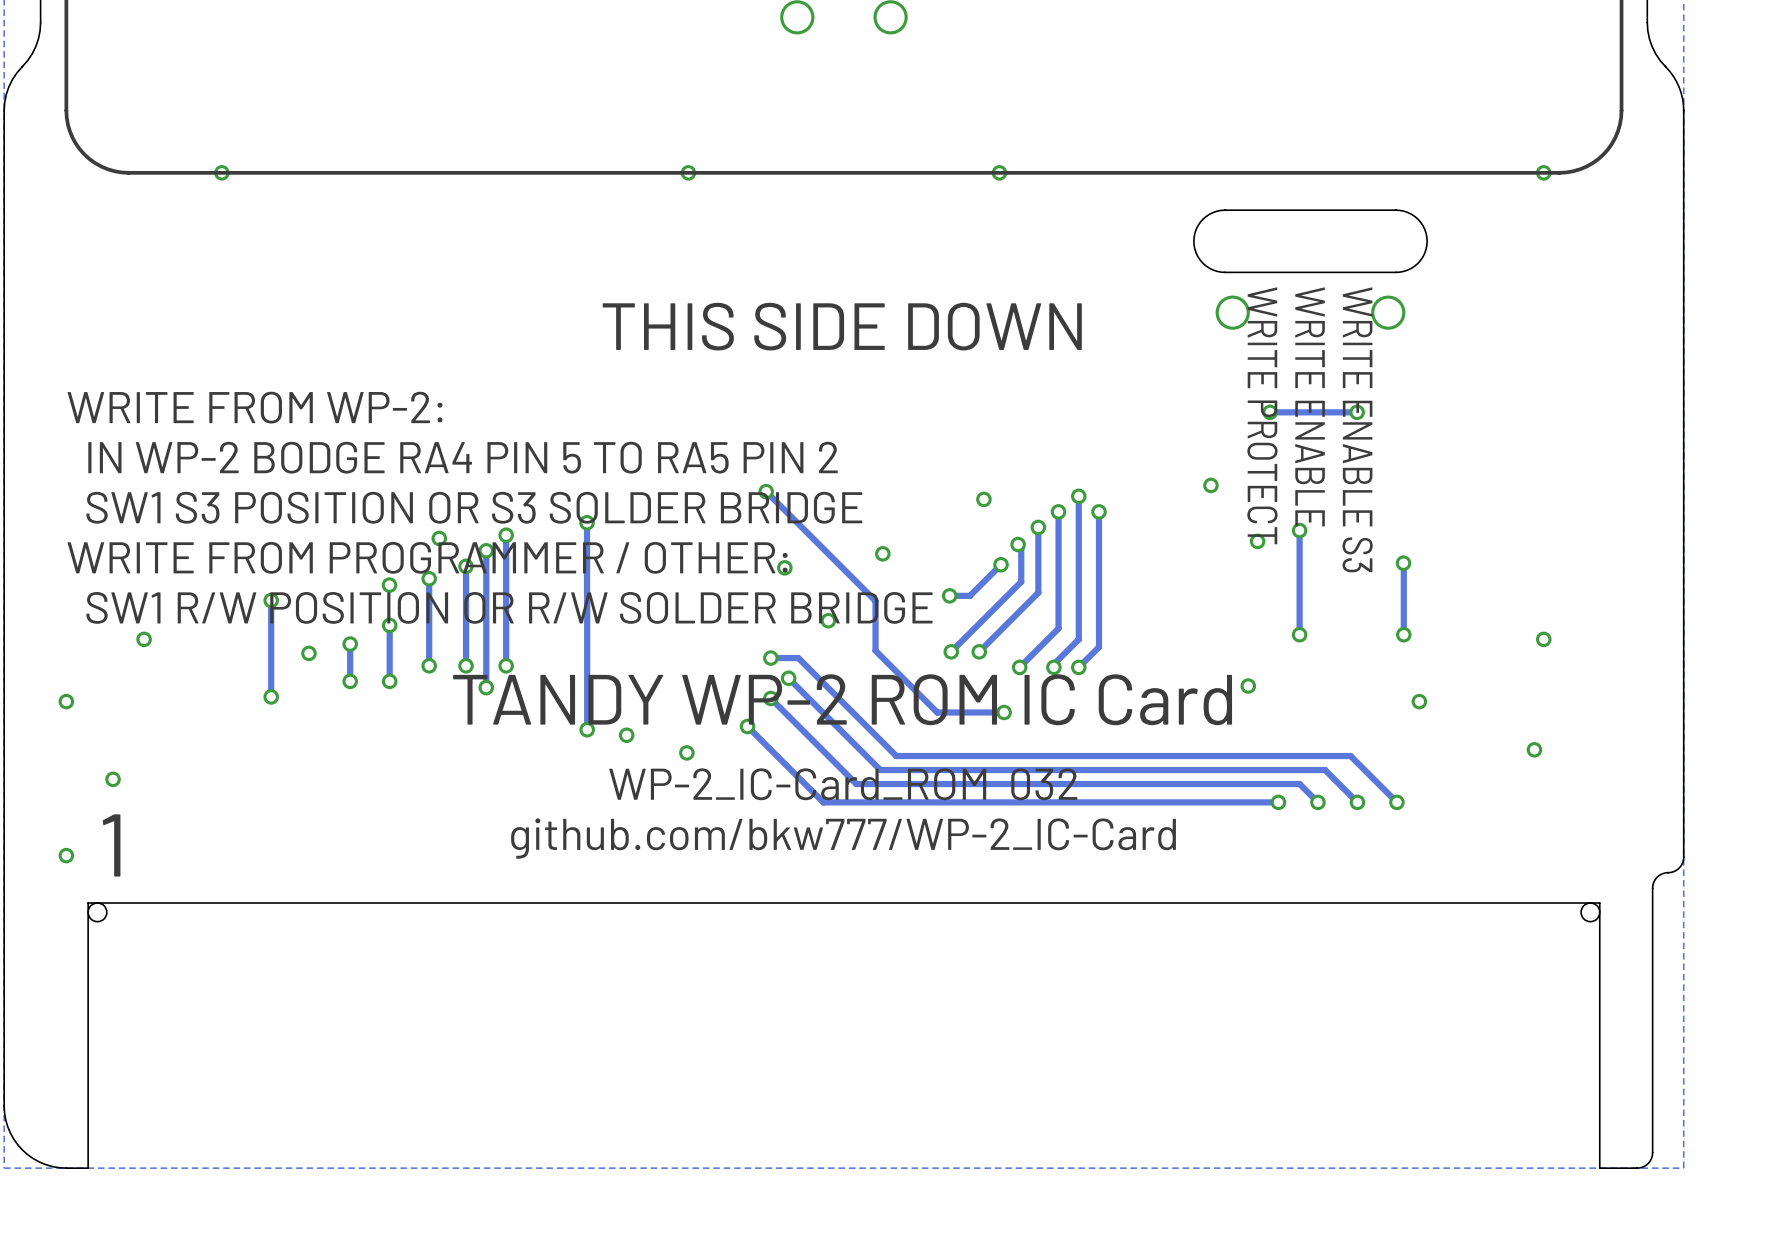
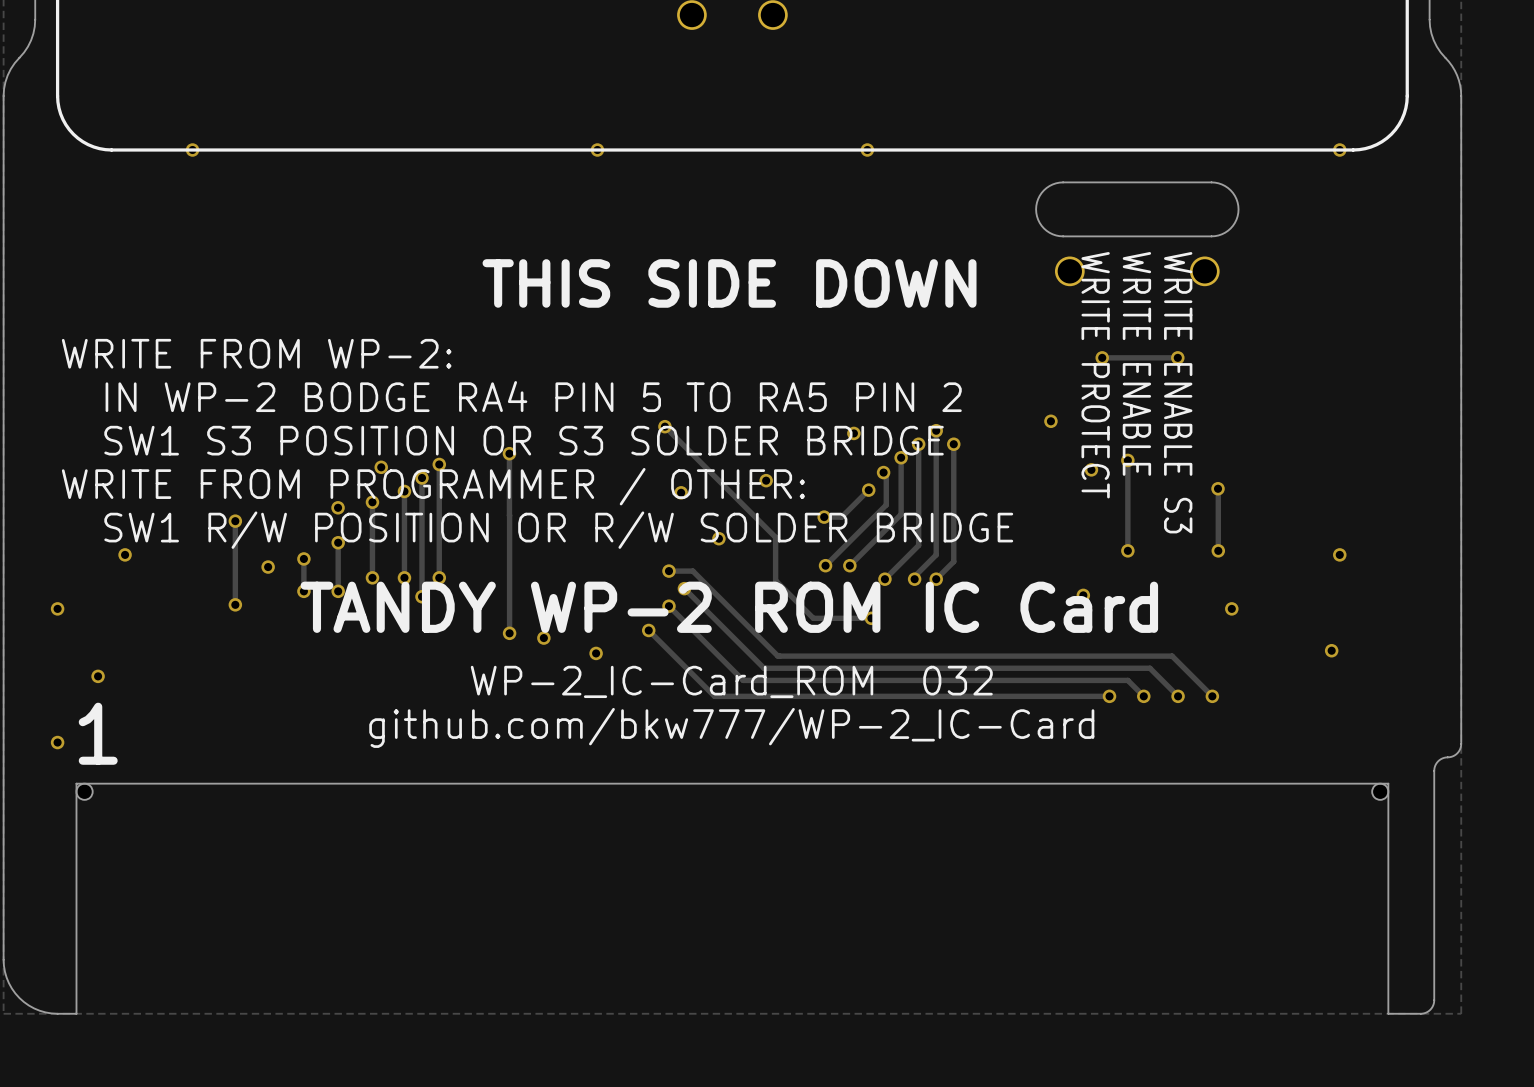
track: (875, 601) (875, 650) (893, 668) -> (759, 521) (775, 537) (775, 580)

